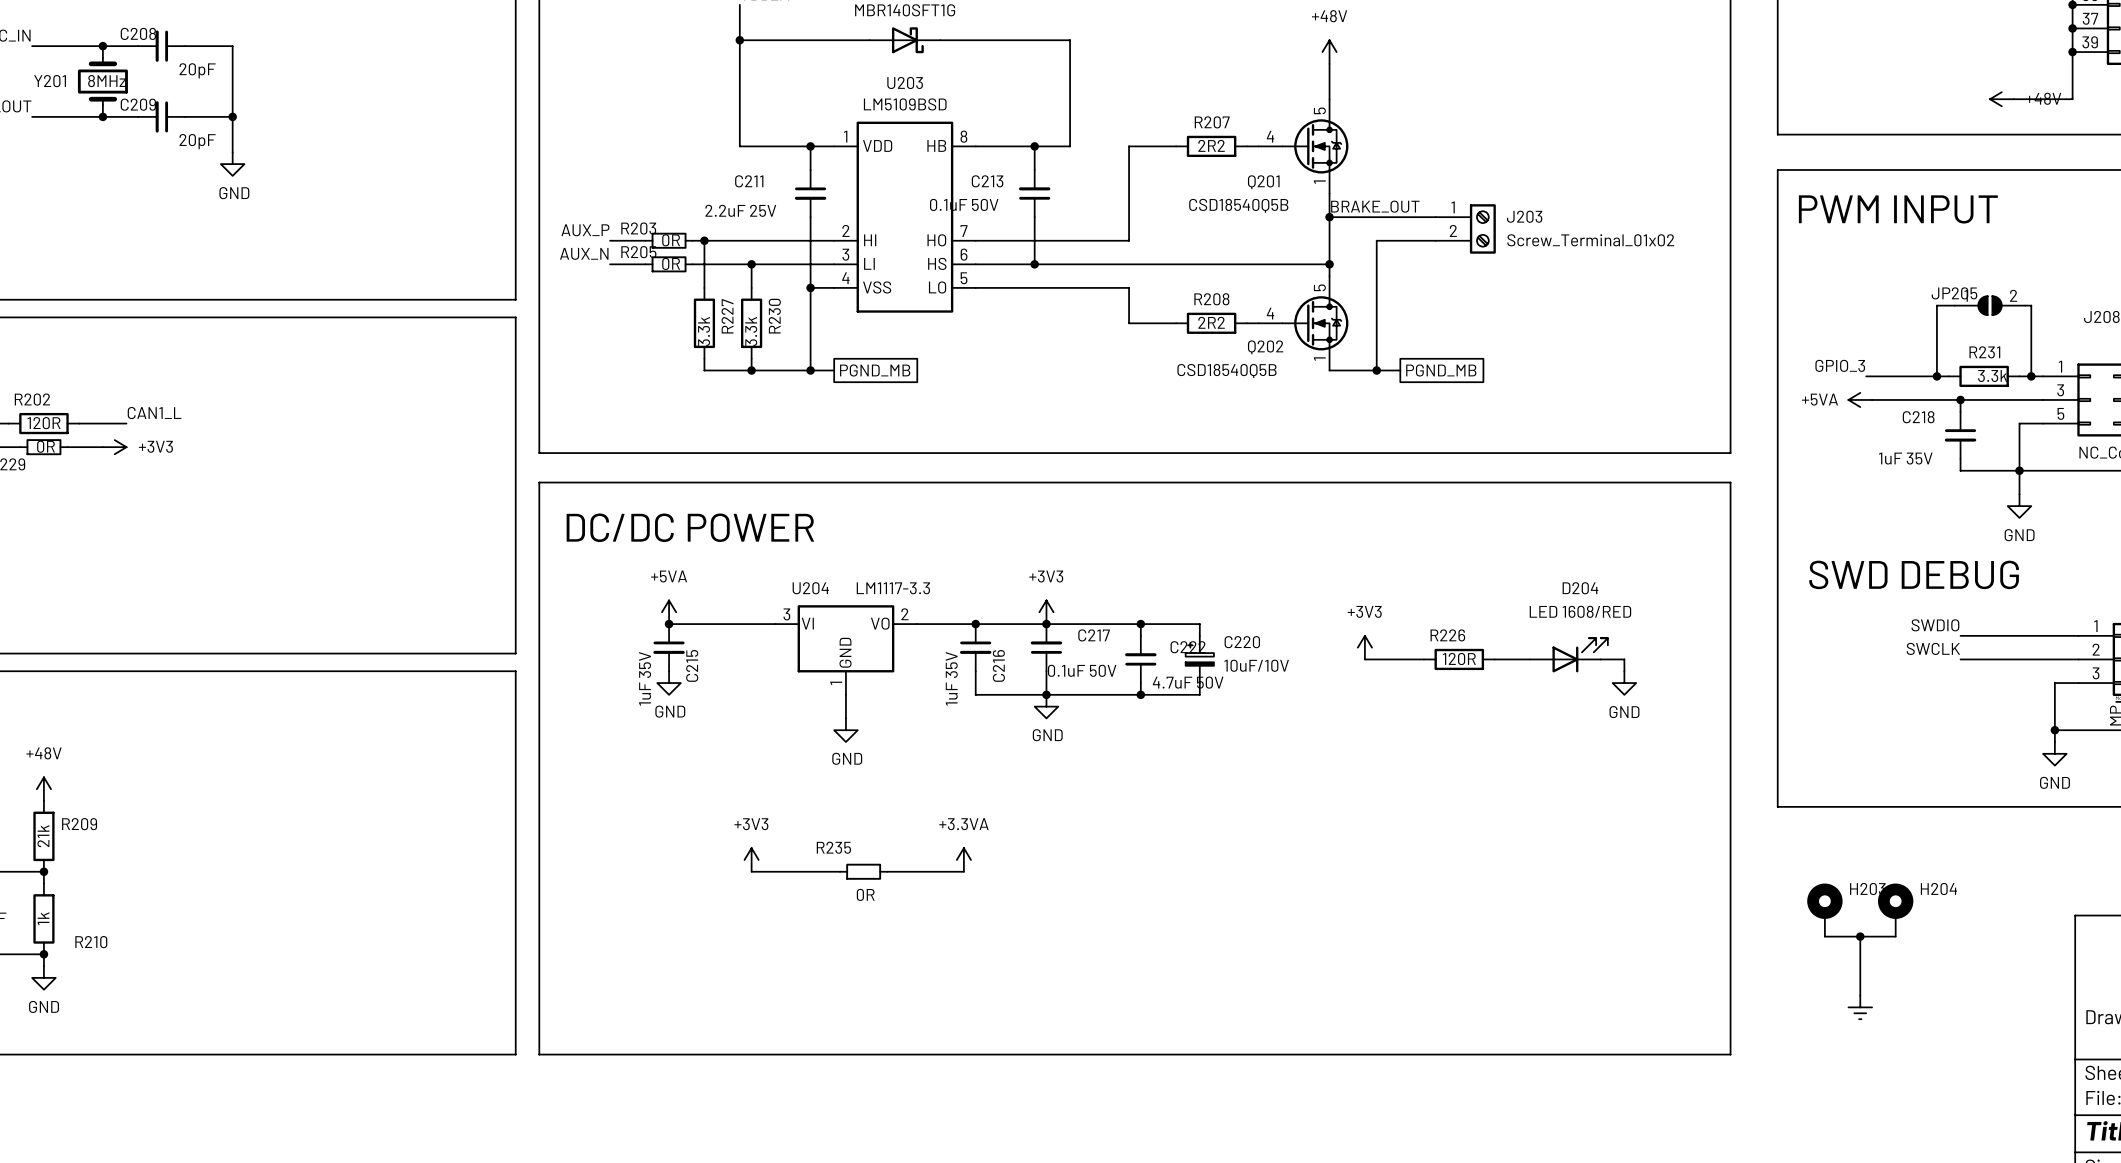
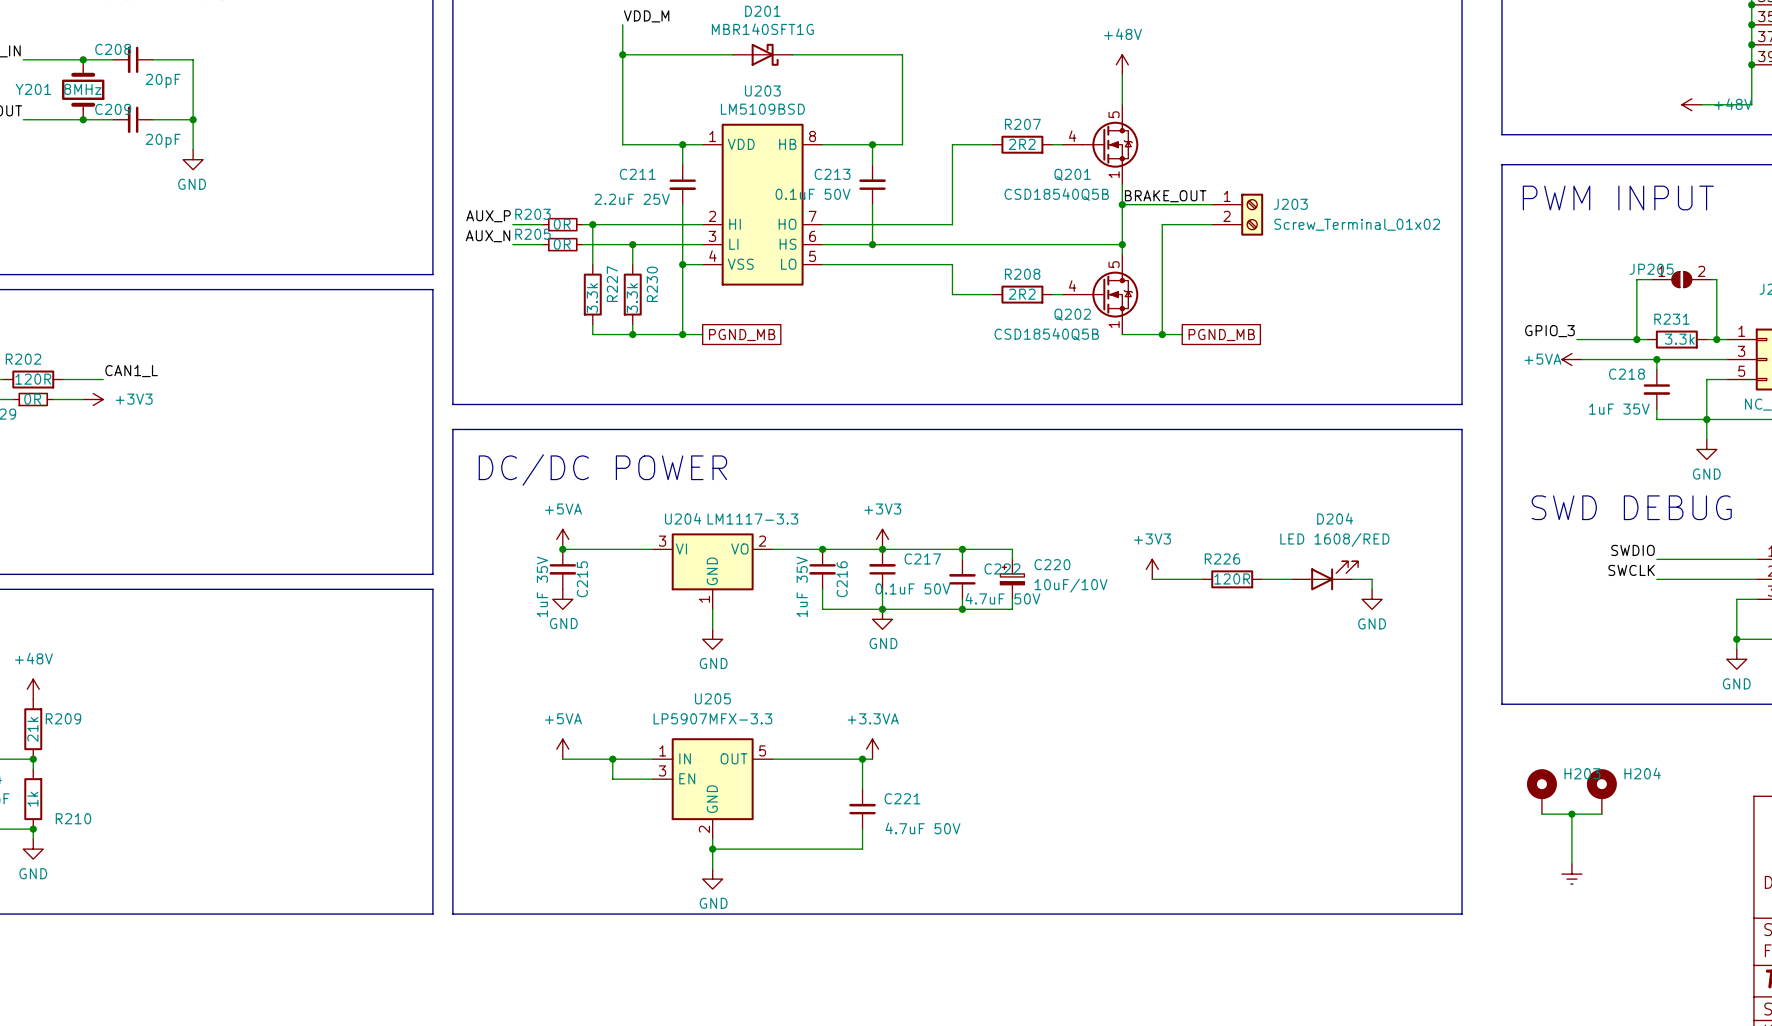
power symbol: none -> +5VA (562, 749)
power symbol: +3V3 (751, 859) -> none
power symbol position: +3.3VA (963, 859) -> +3.3VA (872, 749)
wire: none -> (562, 759) (632, 759)
wire: none -> (612, 759) (612, 779) (652, 779)
junction: none -> (612, 759)
R235: 0R (863, 871) -> none
wire: none -> (812, 759) (872, 759)
wire: none -> (862, 759) (862, 789)
junction: none -> (862, 759)
U205: none -> LP5907MFX-3.3 (712, 788)
C221: none -> 4.7uF 50V (862, 809)
wire: none -> (862, 829) (862, 849) (712, 849)
wire: none -> (712, 839) (712, 869)
junction: none -> (712, 849)
power symbol: none -> GND (712, 879)

